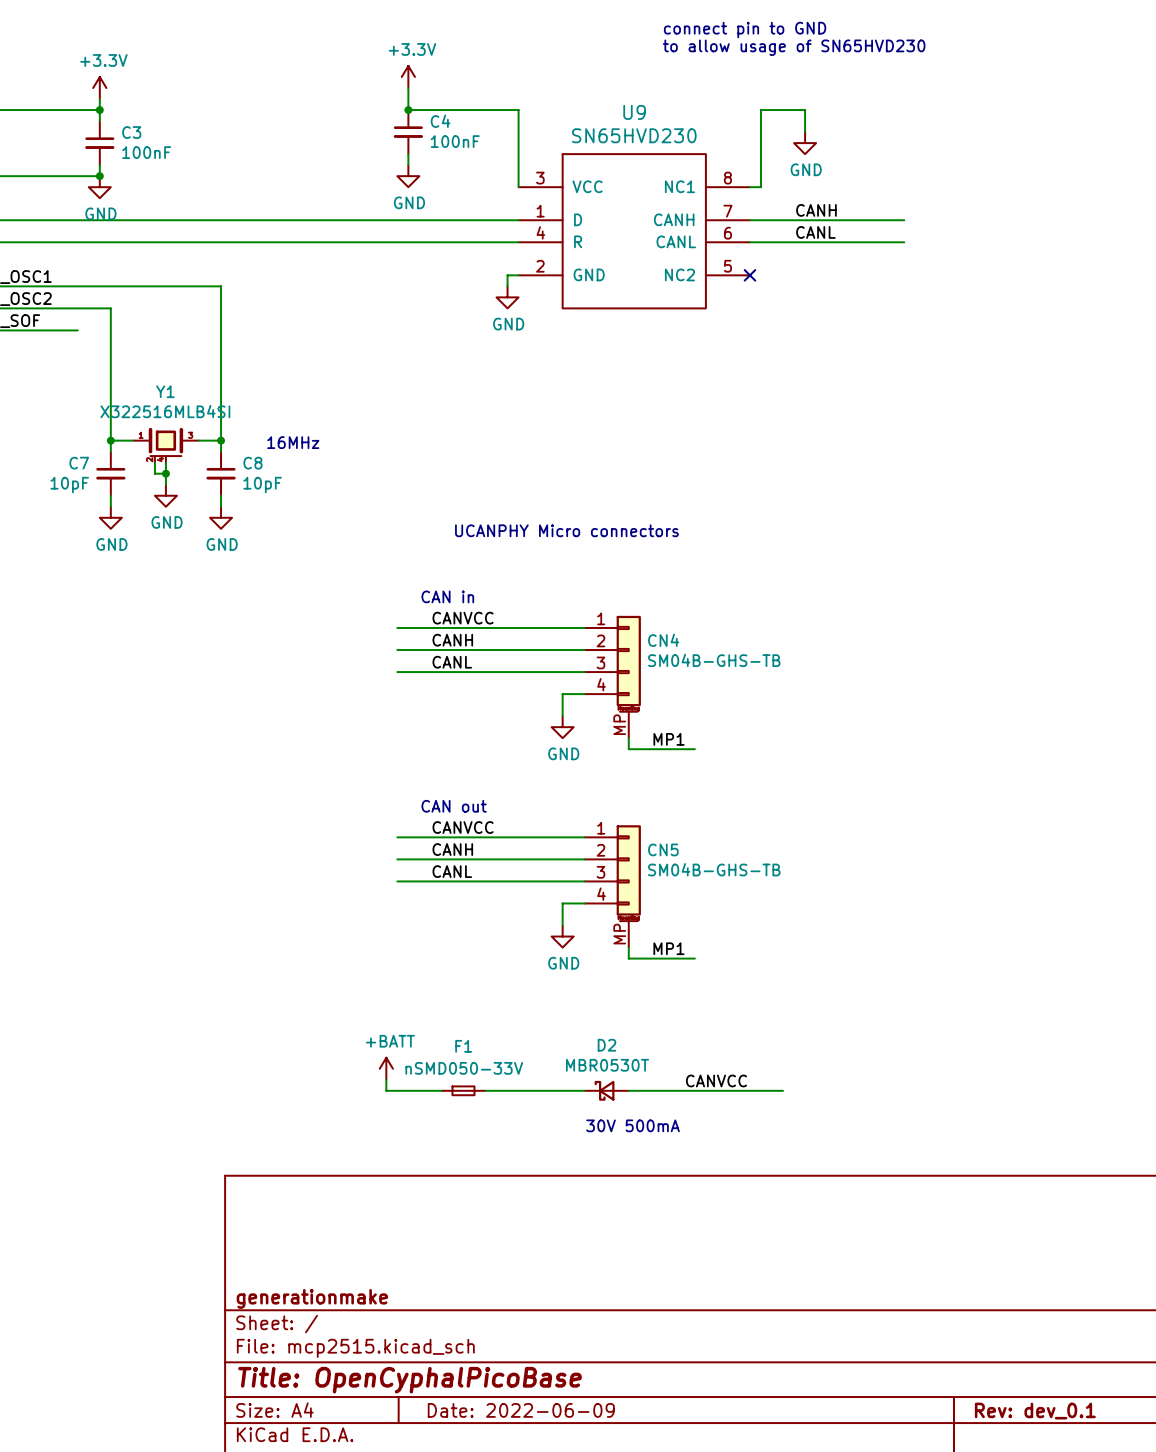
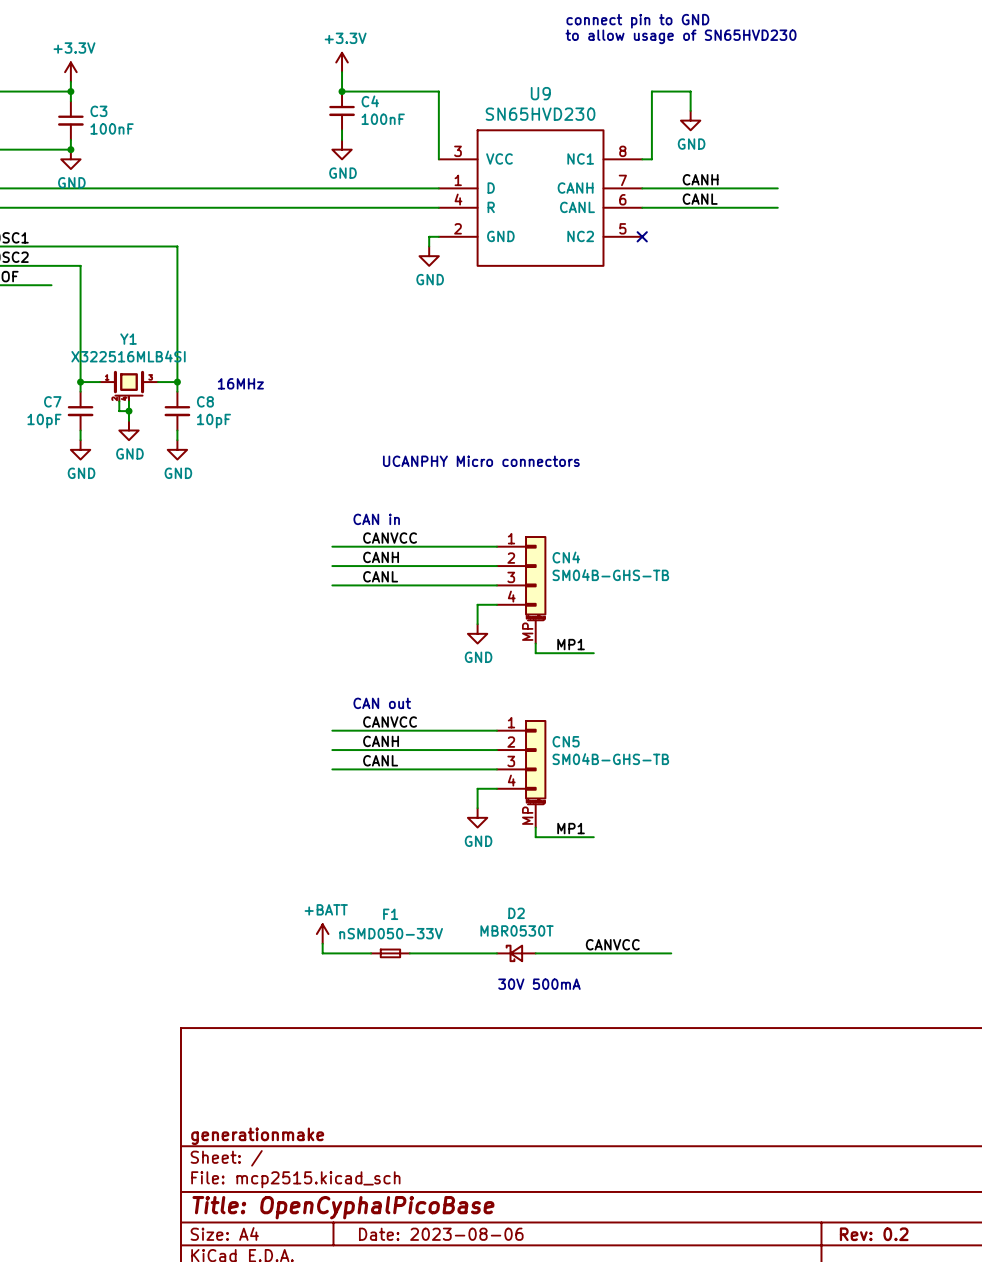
title block: Date: 2022-06-09 (521, 1410) -> Date: 2023-08-06 (441, 1234)
title block: Rev: dev_0.1 (1035, 1411) -> Rev: 0.2 (874, 1234)

